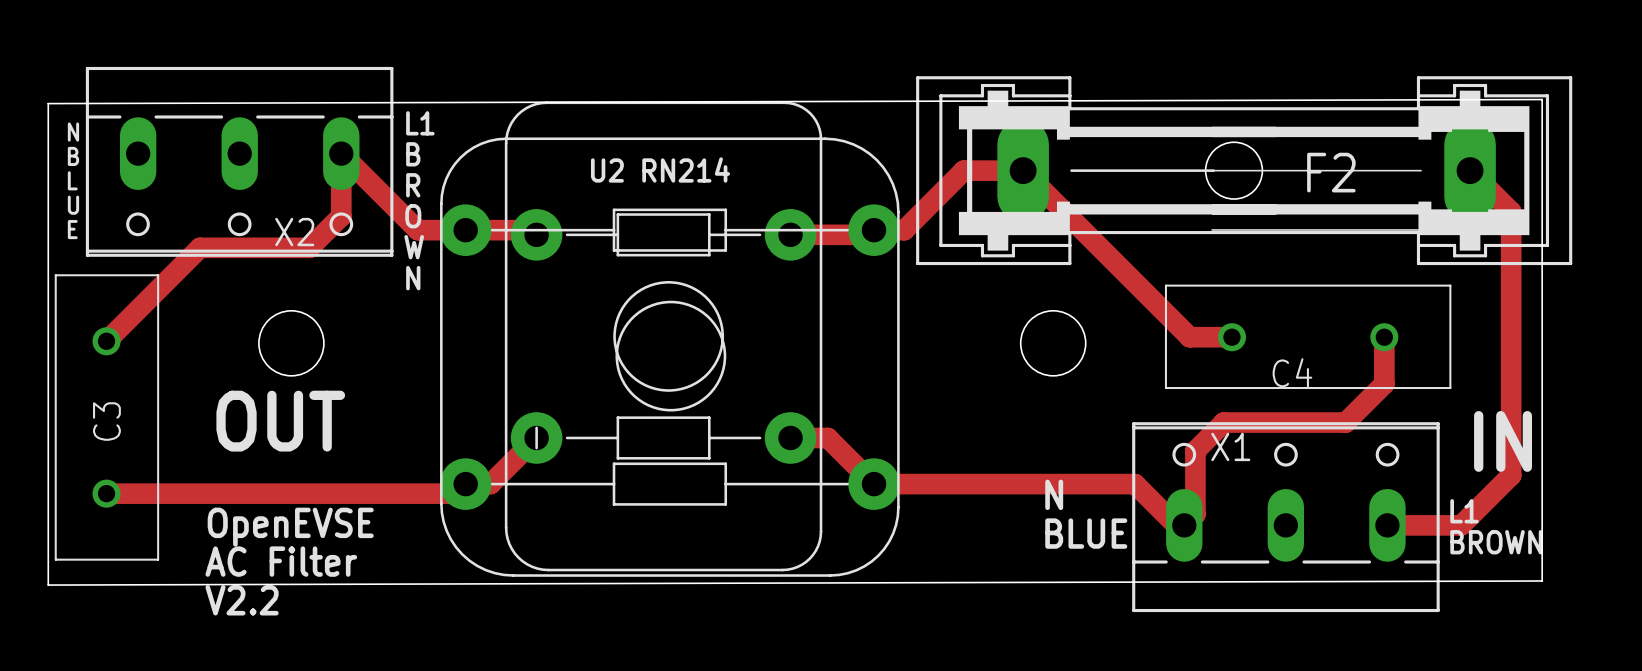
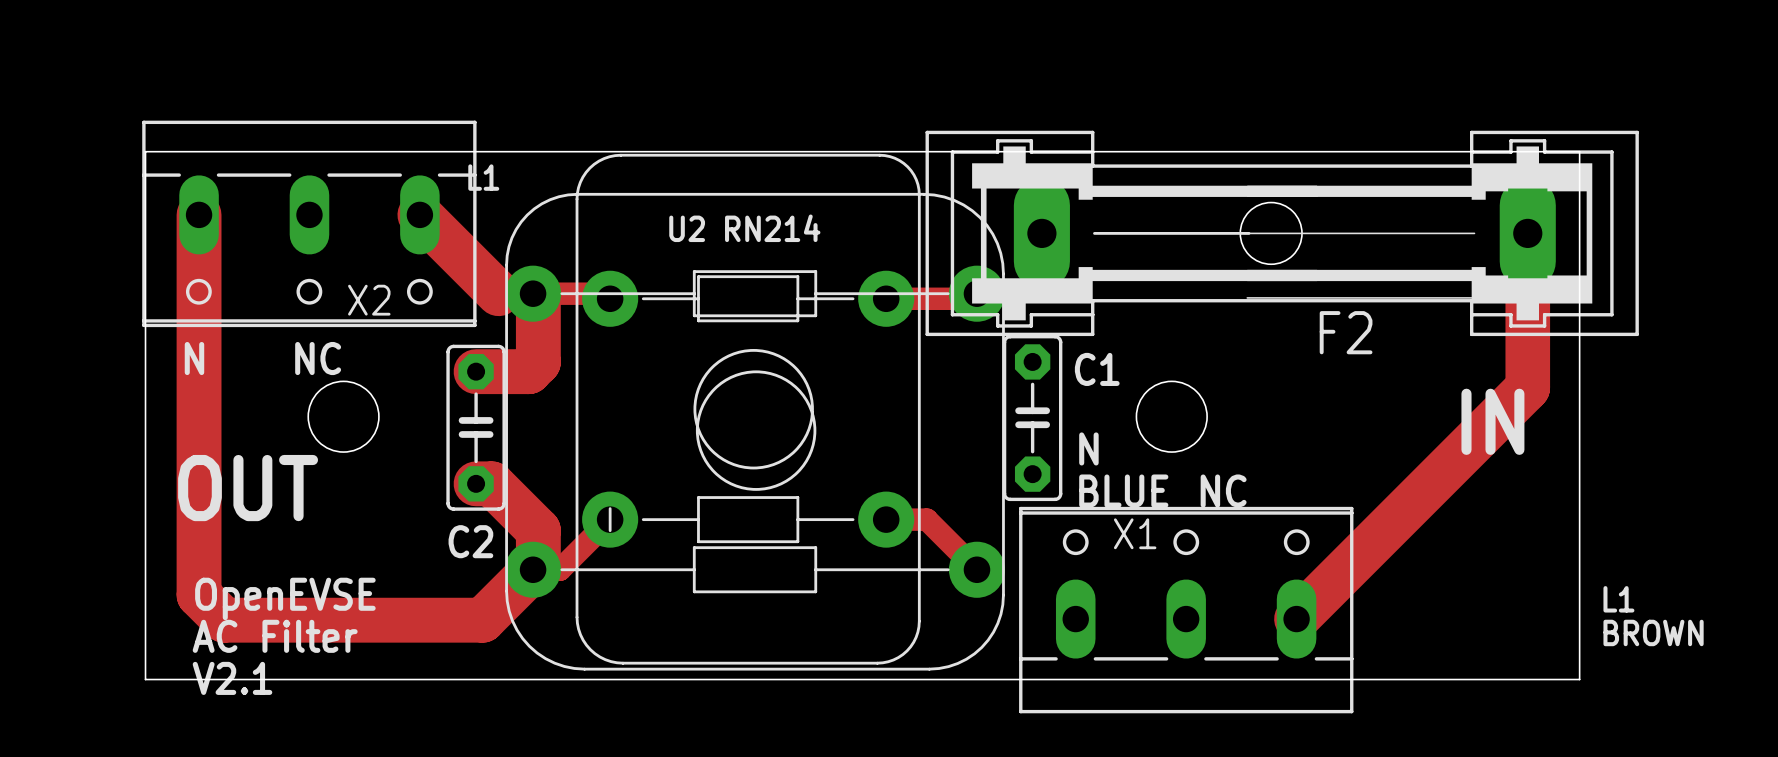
board edge: (1542, 99) (1542, 581) (48, 585) (48, 103) (1542, 99) -> (145, 151) (145, 679) (1579, 679) (1579, 151) (145, 151)
text: N (73, 132) -> none
text: B (413, 154) -> none
text: B (73, 156) -> none
X2 position: (239, 161) -> (309, 223)
F2 position: (1244, 170) -> (1282, 233)
track: (1470, 170) (1511, 211) (1511, 475) (1461, 525) (1387, 525) -> none
F2 name position: F2 (1331, 172) -> F2 (1346, 332)
track: none -> (1527, 233) (1527, 387) (1296, 619)
text: L (72, 180) -> none
text: R (413, 185) -> none
text: U (73, 205) -> none
text: O (413, 216) -> none
text: E (72, 229) -> none
track: (434, 230) (417, 230) (341, 153) (341, 216) (309, 247) (199, 247) (106, 341) -> (498, 293) (419, 214)
track: none -> (533, 293) (538, 299) (538, 362) (528, 371) (476, 371)
track: (874, 230) (904, 230) (963, 170) (1023, 170) (1189, 337) (1231, 337) -> none
text: W (414, 247) -> none
text: N (413, 278) -> none
text: none -> N (194, 358)
text: none -> NC (318, 358)
C4: (1308, 336) -> none
track: (1384, 337) (1384, 383) (1345, 422) (1223, 422) (1195, 450) (1195, 514) (1184, 525) -> none
C1: none -> (1032, 418)
C2: none -> (476, 427)
track: none -> (476, 483) (491, 483) (538, 530) (538, 564)
text: none -> NC (1223, 491)
C3: (106, 417) -> none
text position: OUT (280, 421) -> OUT (248, 488)
text position: IN (1503, 441) -> IN (1492, 421)
X1 name position: X1 (1230, 446) -> X1 (1135, 533)
track: (874, 484) (1135, 484) (1187, 536) -> none
track: (106, 493) (456, 493) -> (199, 214) (199, 595) (224, 620) (482, 620) (522, 580)
text position: N (1054, 494) -> N (1088, 448)
X1 position: (1285, 517) -> (1186, 610)
text position: OpenEVSE (290, 527) -> OpenEVSE (285, 598)
text position: BLUE (1086, 533) -> BLUE (1123, 491)
text position: AC Filter (281, 561) -> AC Filter (275, 636)
text: V2.2 (242, 600) -> V2.1 (232, 678)

